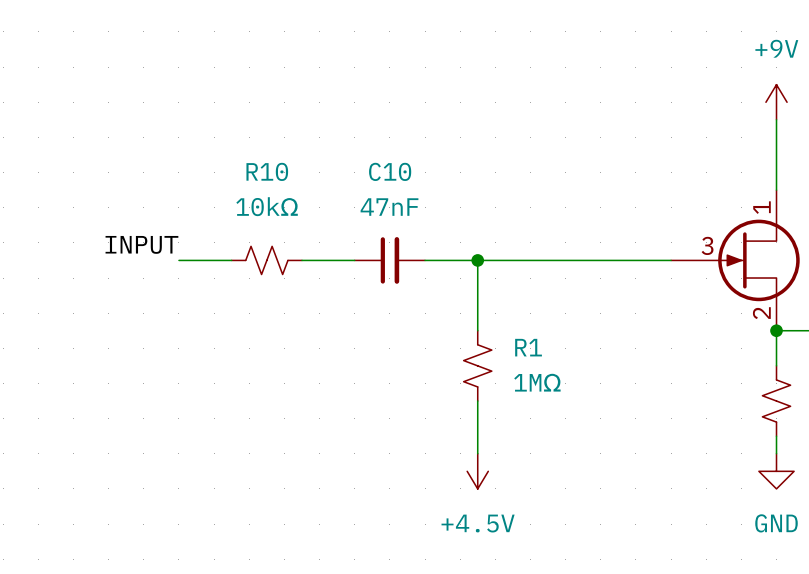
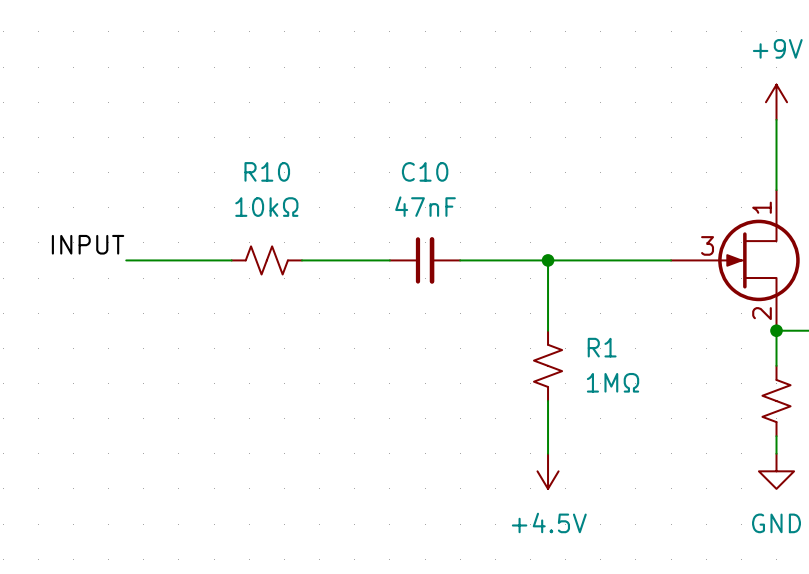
label position: INPUT (141, 244) -> INPUT (88, 244)
wire: none -> (126, 260) (178, 260)
C10 position: (389, 260) -> (425, 260)
wire: (477, 260) (477, 330) -> (548, 260) (548, 330)
junction position: (477, 260) -> (548, 260)
R1 position: (477, 365) -> (548, 365)
wire: (477, 401) (477, 453) -> (548, 401) (548, 453)
power symbol position: +4.5V (477, 471) -> +4.5V (548, 471)

